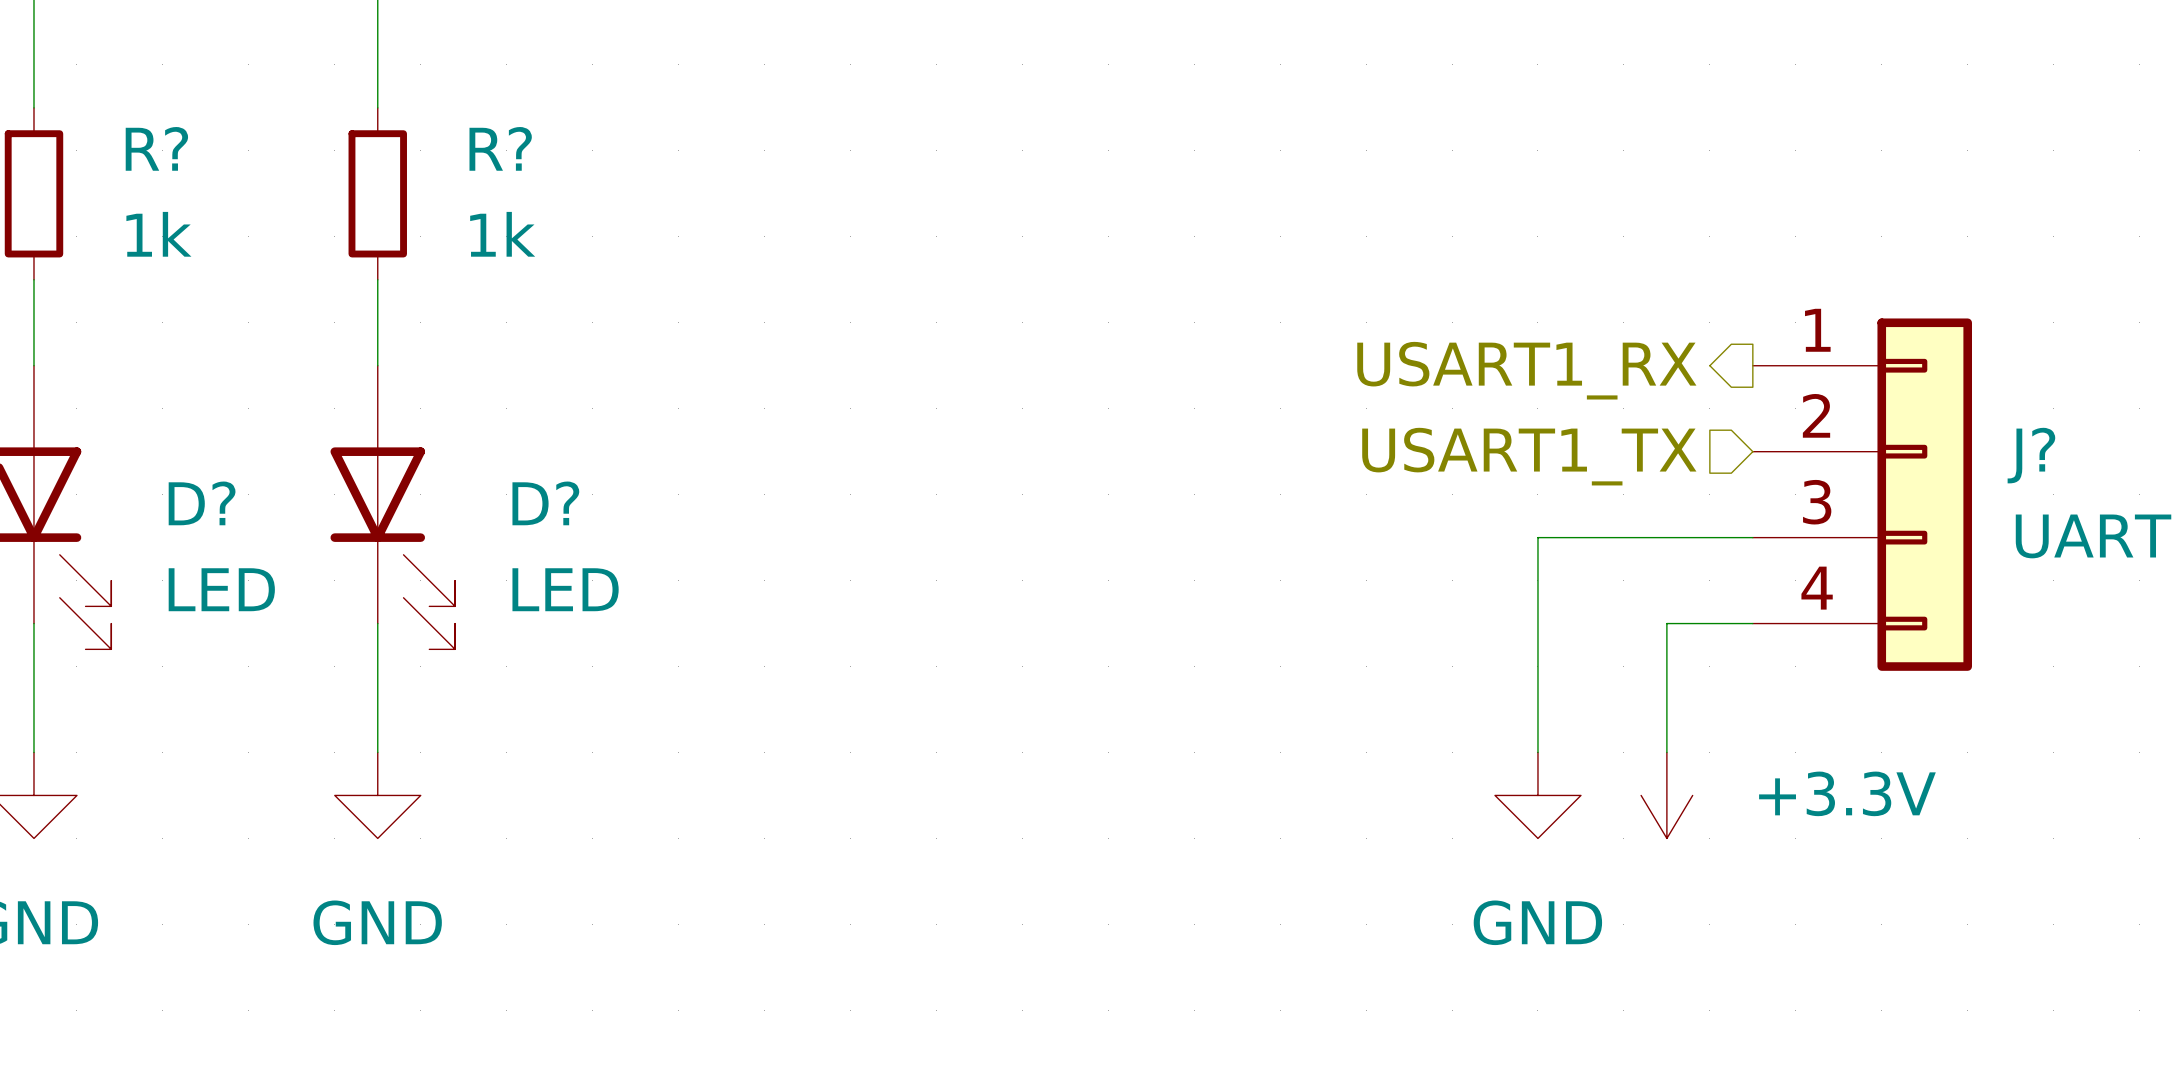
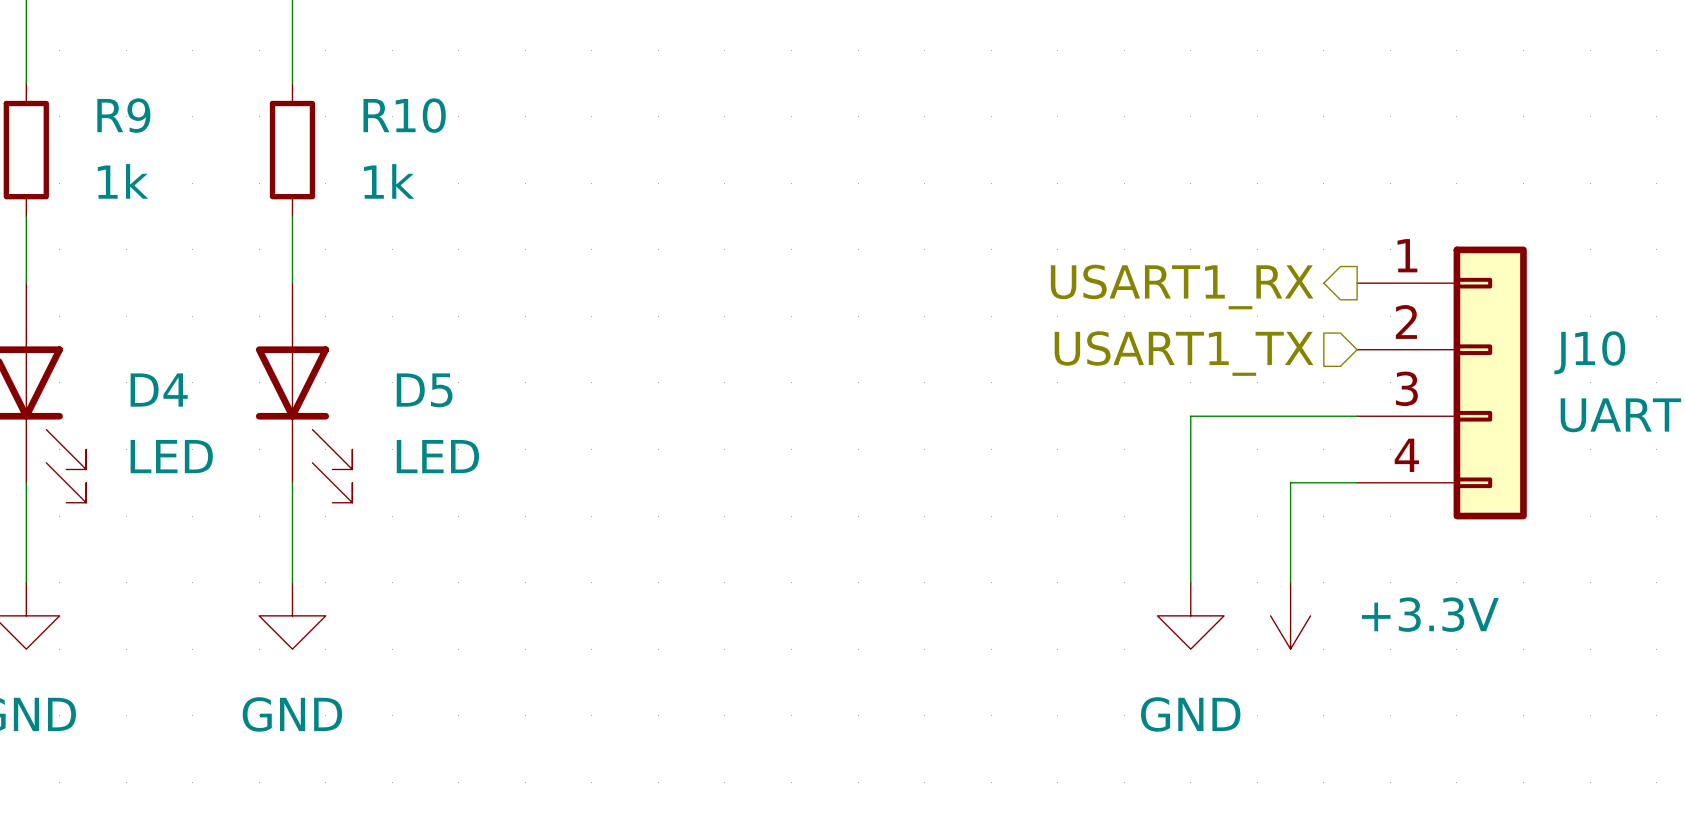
R? name: R? (156, 148) -> R9 (123, 115)
R? name: R? (500, 148) -> R10 (404, 115)
J? name: J? (2031, 455) -> J10 (1589, 352)
D? name: D? (202, 503) -> D4 (159, 390)
D? name: D? (545, 503) -> D5 (424, 390)

